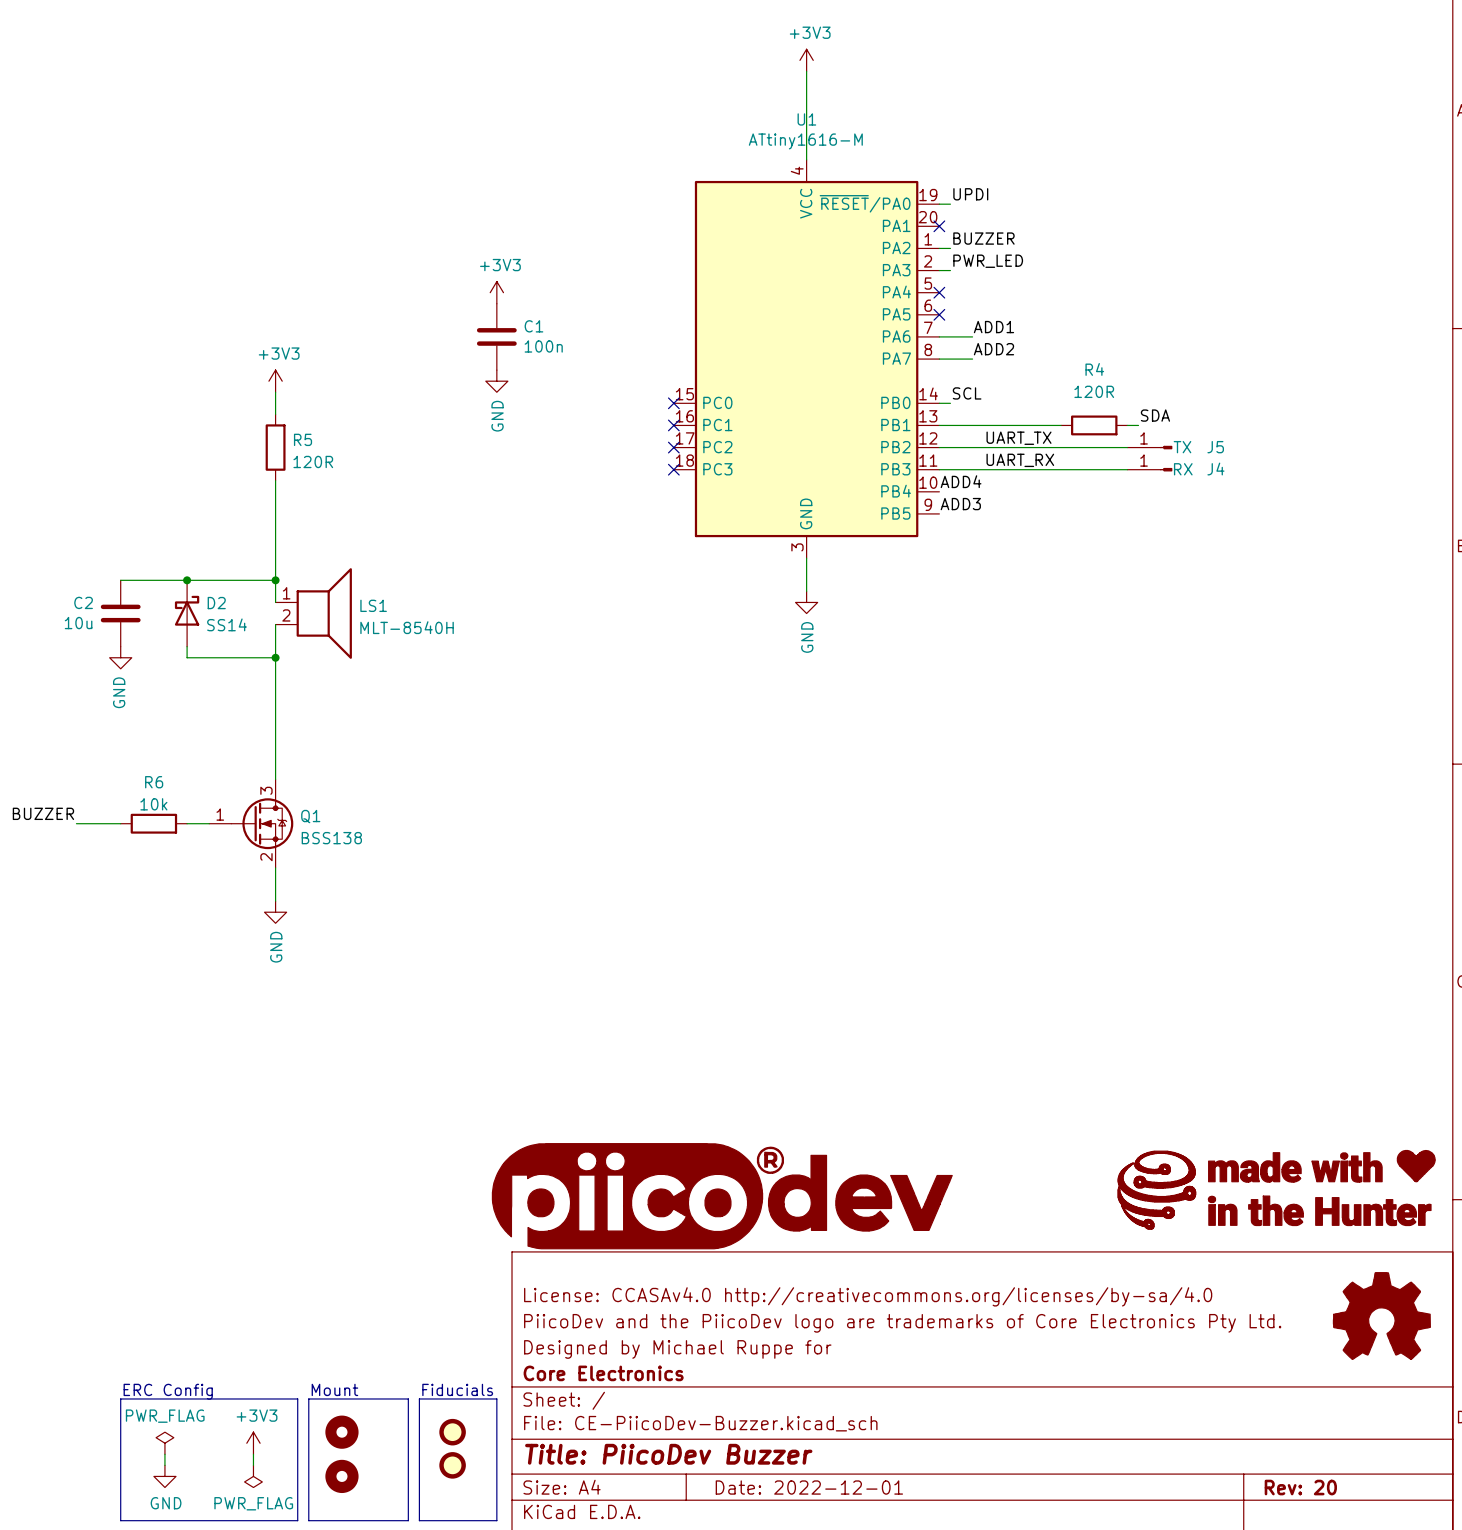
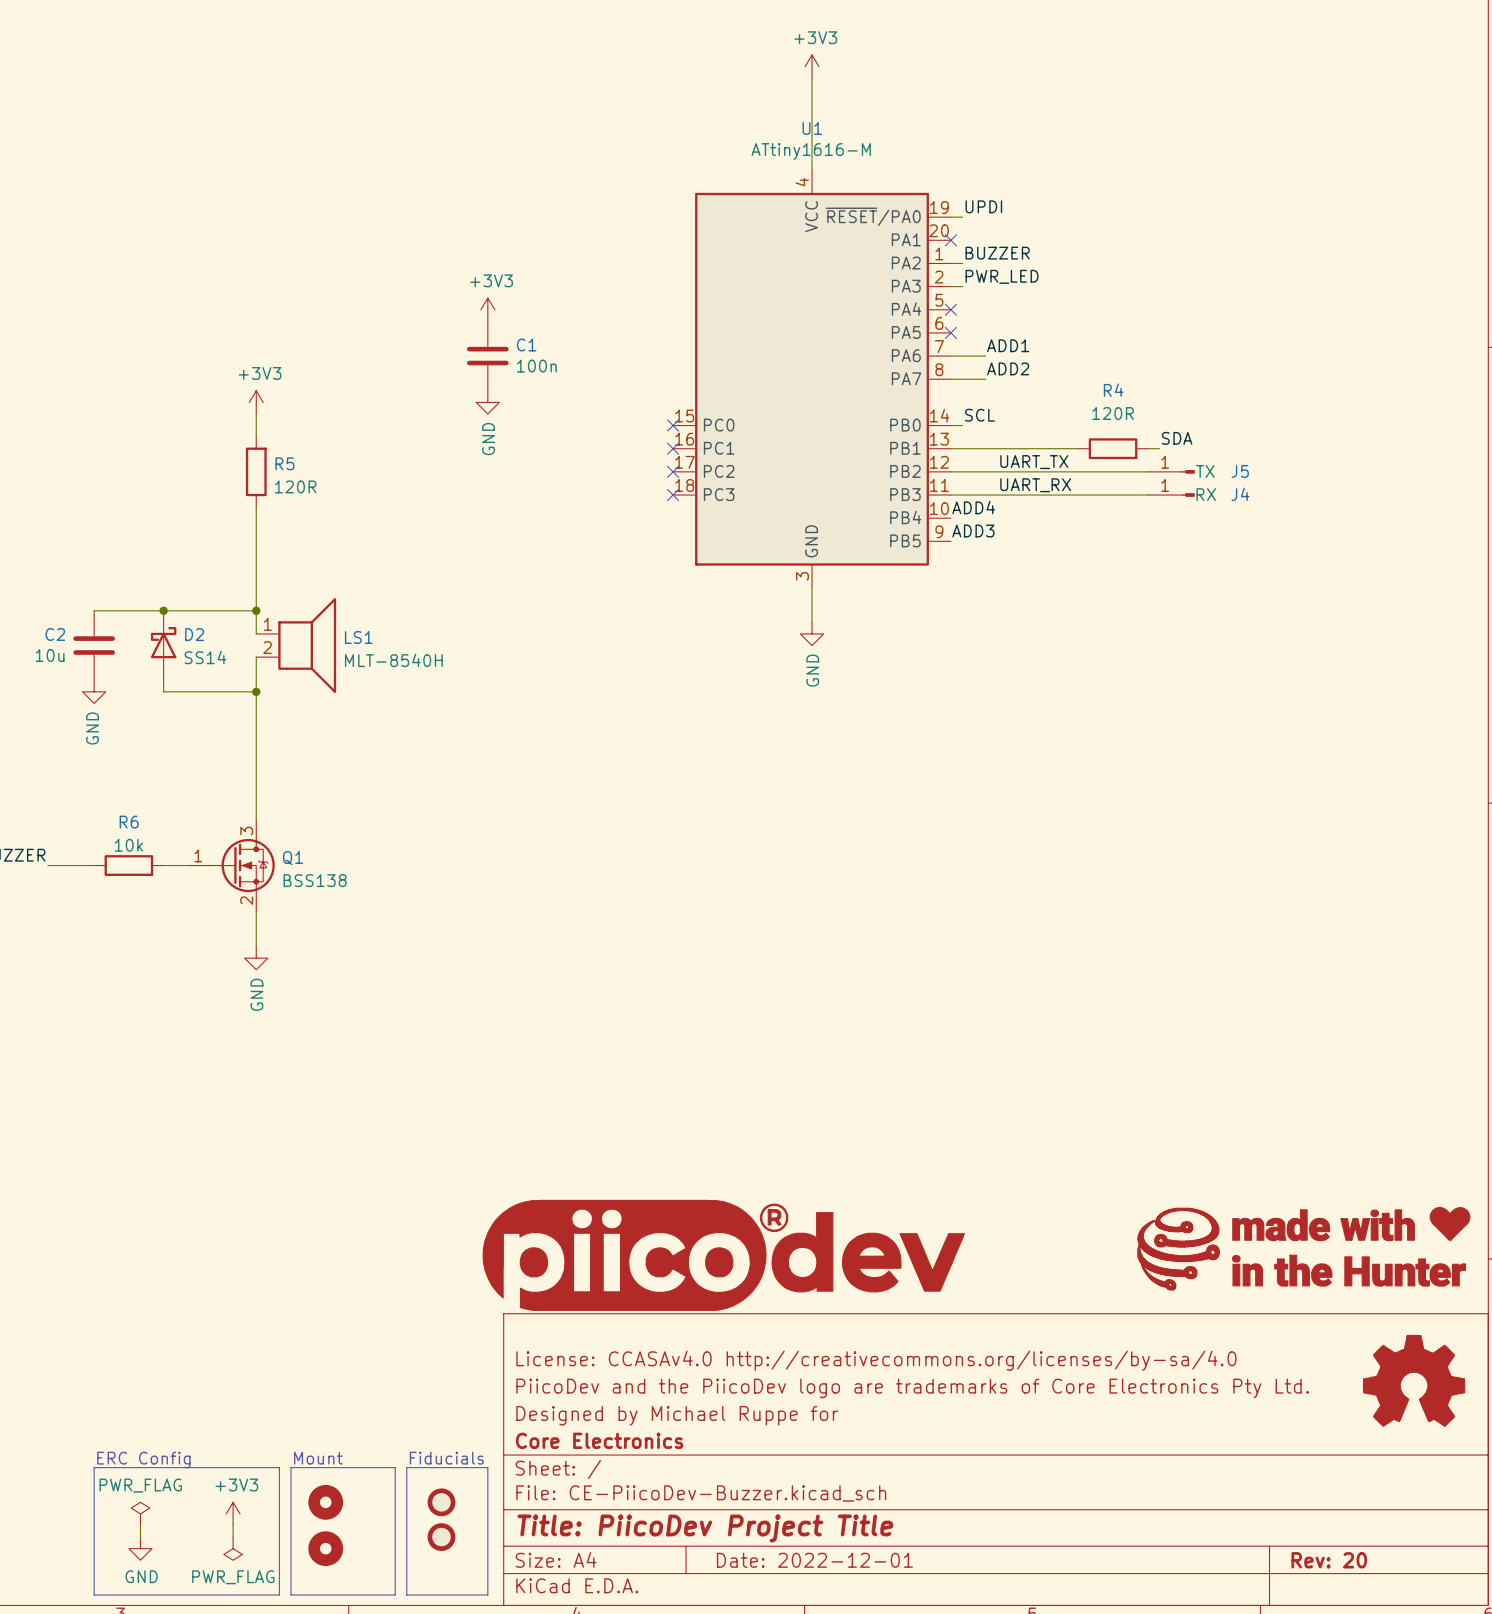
title block: Title: PiicoDev Buzzer (668, 1454) -> Title: PiicoDev Project Title (705, 1528)

